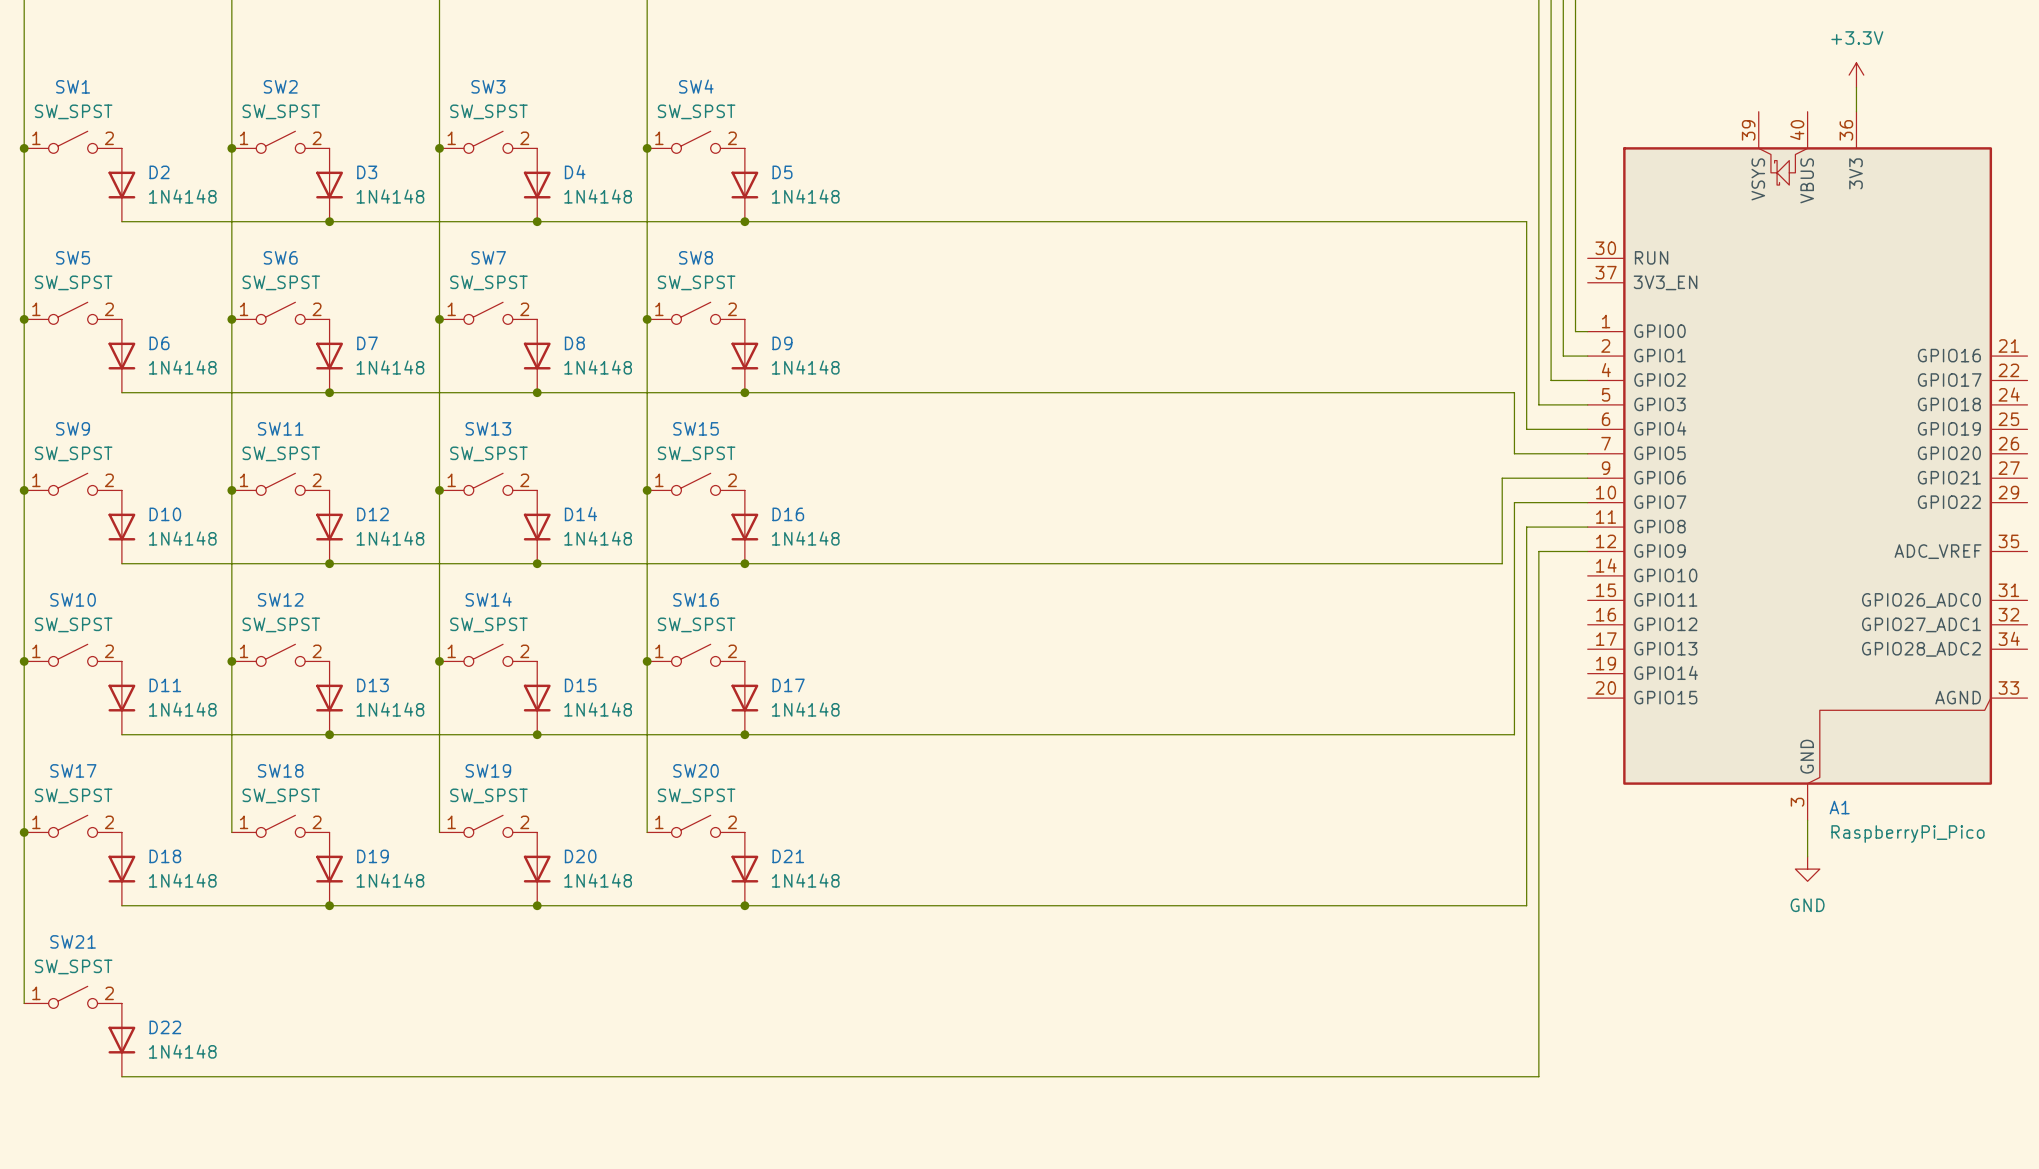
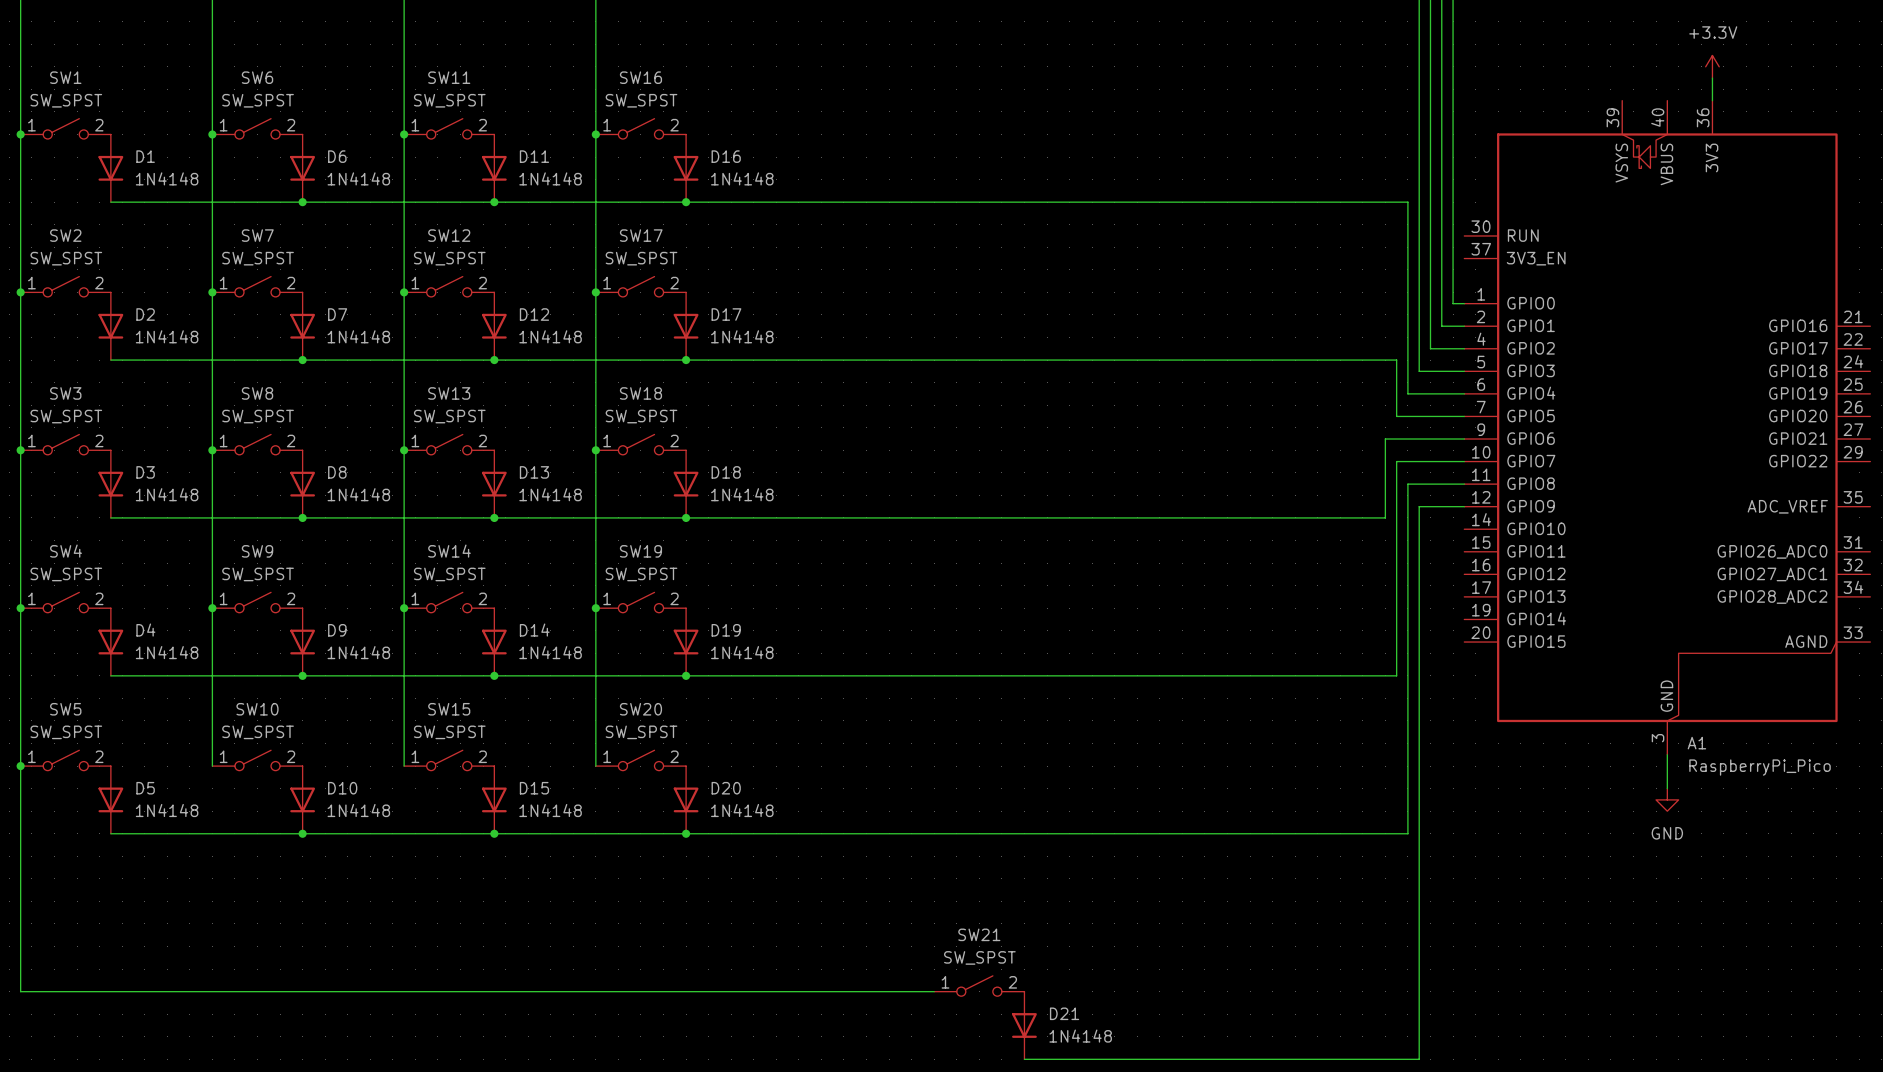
SW2 name: SW2 (280, 86) -> SW6 (257, 77)
SW3 name: SW3 (488, 86) -> SW11 (449, 77)
SW4 name: SW4 (696, 86) -> SW16 (640, 77)
D2 name: D2 (159, 172) -> D1 (145, 156)
D3 name: D3 (367, 172) -> D6 (337, 156)
D4 name: D4 (575, 172) -> D11 (534, 156)
D5 name: D5 (782, 172) -> D16 (726, 156)
SW5 name: SW5 (73, 257) -> SW2 (65, 235)
SW6 name: SW6 (280, 257) -> SW7 (257, 235)
SW7 name: SW7 (488, 257) -> SW12 (449, 235)
SW8 name: SW8 (696, 257) -> SW17 (641, 235)
D6 name: D6 (159, 343) -> D2 (145, 314)
D8 name: D8 (574, 343) -> D12 (534, 314)
D9 name: D9 (782, 343) -> D17 (726, 314)
SW9 name: SW9 (73, 428) -> SW3 (65, 393)
SW11 name: SW11 (280, 428) -> SW8 (257, 393)
SW15 name: SW15 (696, 428) -> SW18 (640, 393)
D10 name: D10 (165, 514) -> D3 (145, 472)
D12 name: D12 (372, 514) -> D8 (337, 472)
D14 name: D14 (580, 514) -> D13 (534, 472)
D16 name: D16 (788, 514) -> D18 (726, 472)
SW10 name: SW10 (73, 599) -> SW4 (66, 551)
SW12 name: SW12 (280, 599) -> SW9 (257, 551)
SW16 name: SW16 (696, 599) -> SW19 (640, 551)
D11 name: D11 (165, 685) -> D4 (145, 630)
D13 name: D13 (372, 685) -> D9 (337, 630)
D15 name: D15 (580, 685) -> D14 (534, 630)
D17 name: D17 (788, 685) -> D19 (726, 630)
SW17 name: SW17 (73, 770) -> SW5 (65, 709)
SW18 name: SW18 (280, 770) -> SW10 (257, 709)
SW19 name: SW19 (488, 770) -> SW15 (449, 709)
D18 name: D18 (165, 856) -> D5 (145, 788)
D19 name: D19 (372, 856) -> D10 (342, 788)
D20 name: D20 (580, 856) -> D15 (534, 788)
D21 name: D21 (788, 856) -> D20 (726, 788)
SW21 position: (73, 997) -> (979, 986)
wire: none -> (20, 923) (20, 991) (110, 991)
D22: 1N4148 (121, 1040) -> none
wire: (1013, 1076) (1538, 1076) -> (1024, 1059) (1419, 1059) (1419, 991)
D21: none -> 1N4148 (1024, 1025)

